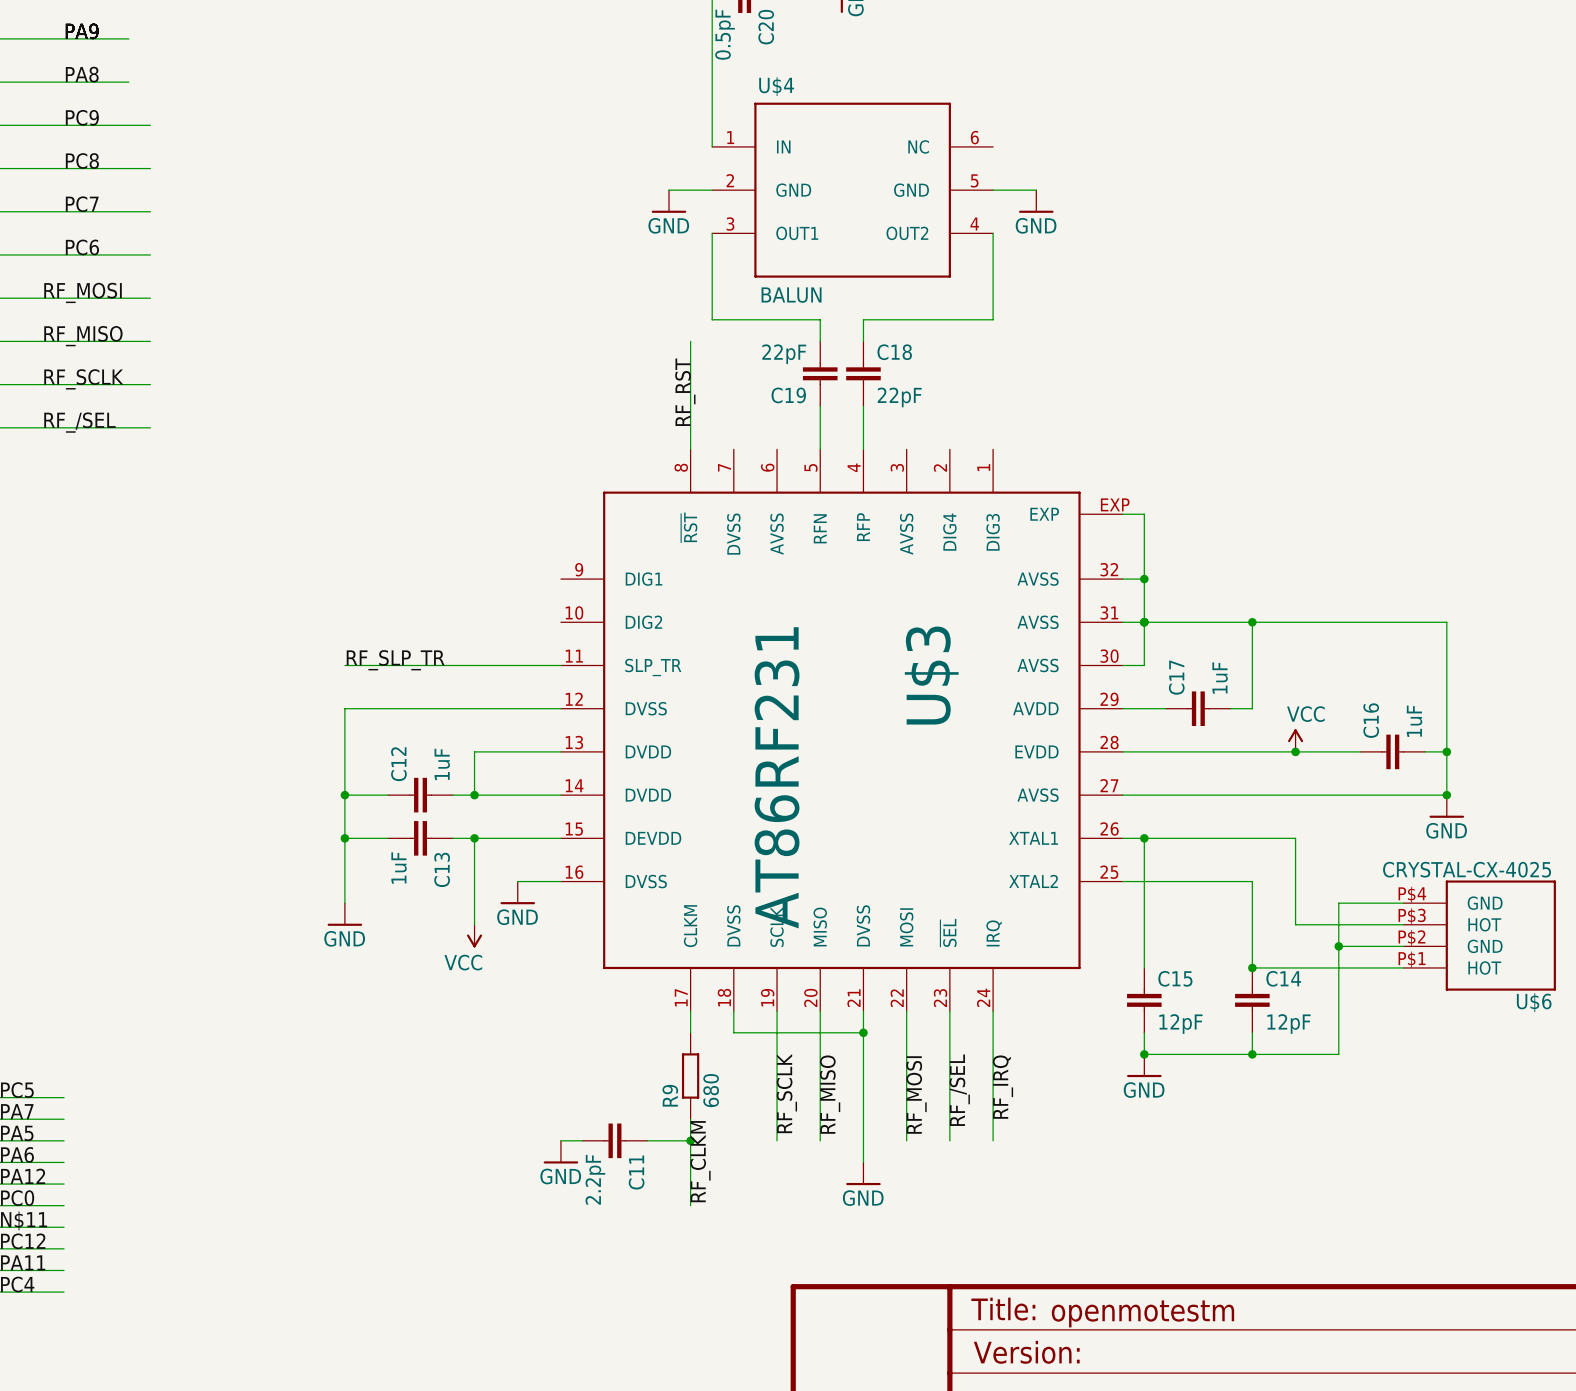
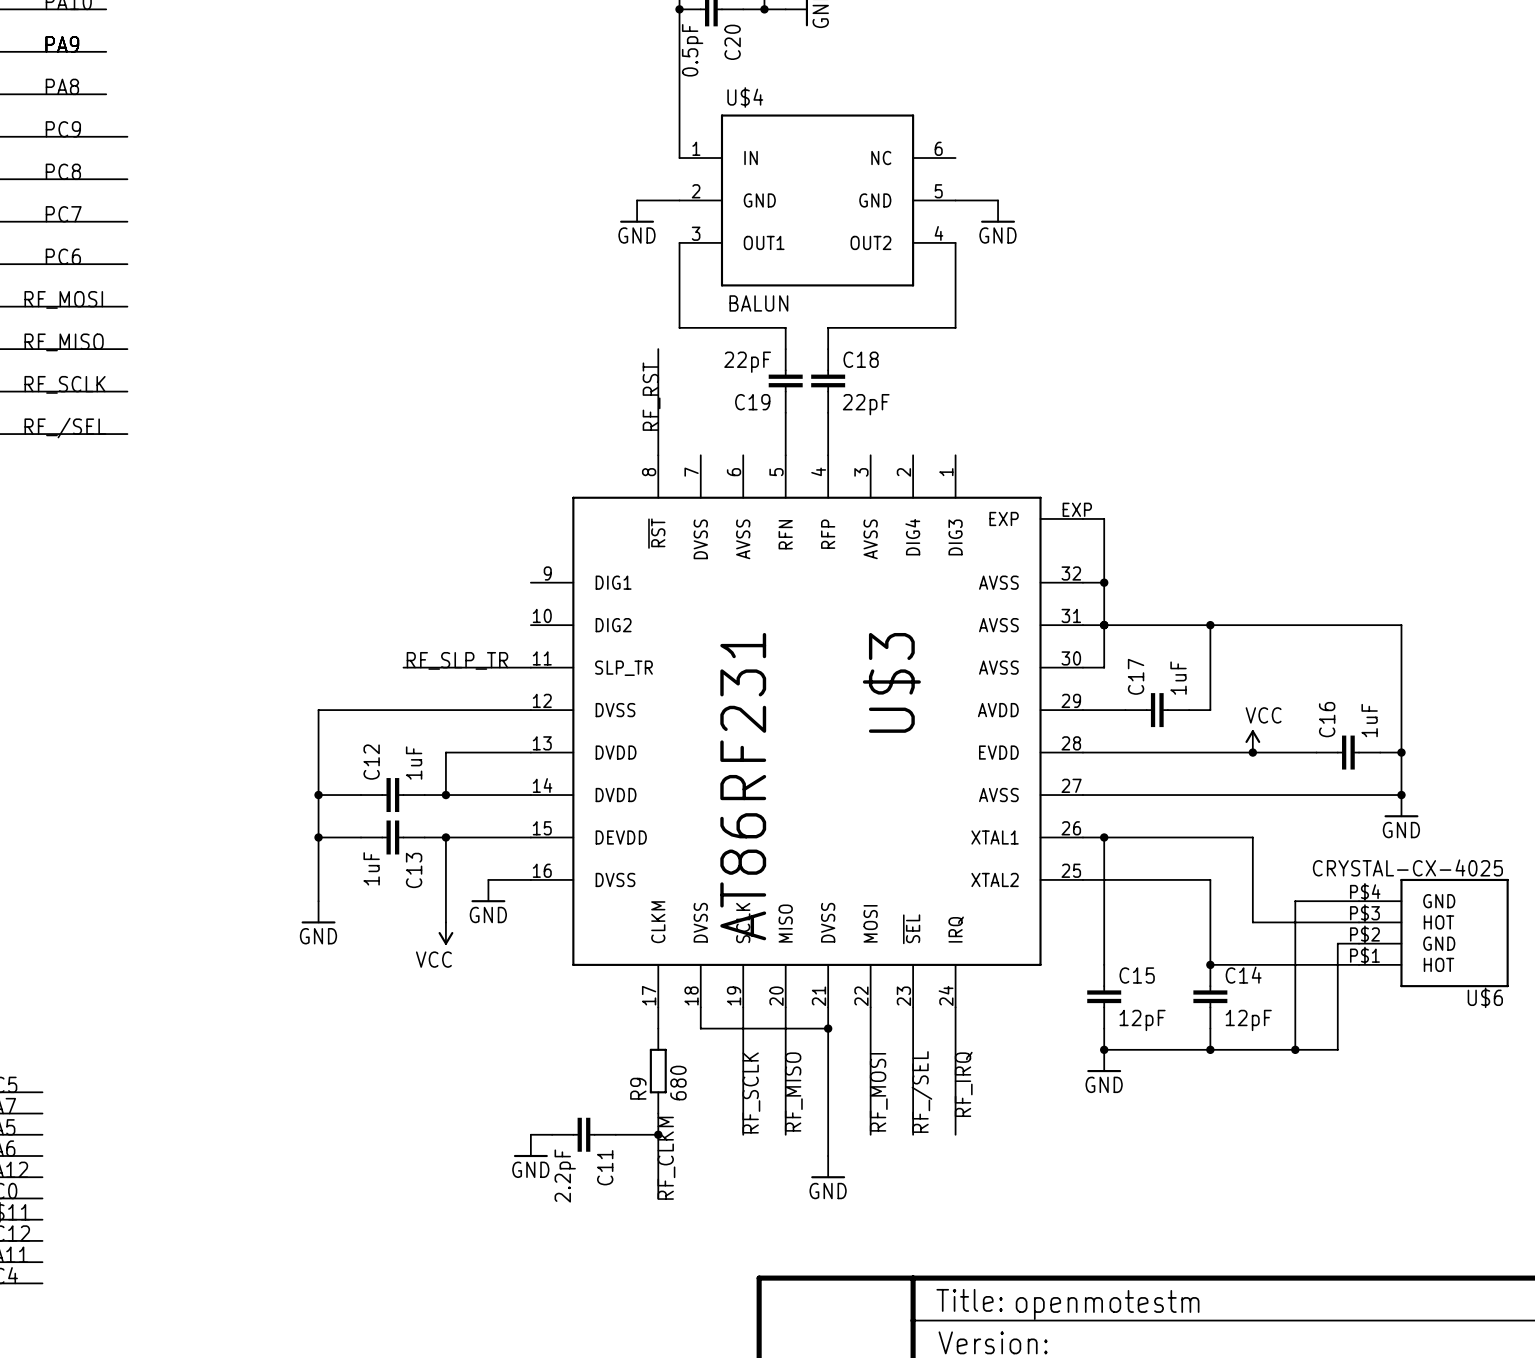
label position: RF_SLP_TR (395, 660) -> RF_SLP_TR (457, 660)
wire: (344, 665) (431, 665) -> none
wire: (1338, 946) (1382, 946) -> (1295, 1049) (1337, 1049) (1337, 943)
junction: (1338, 946) -> none
junction: none -> (1295, 1049)

